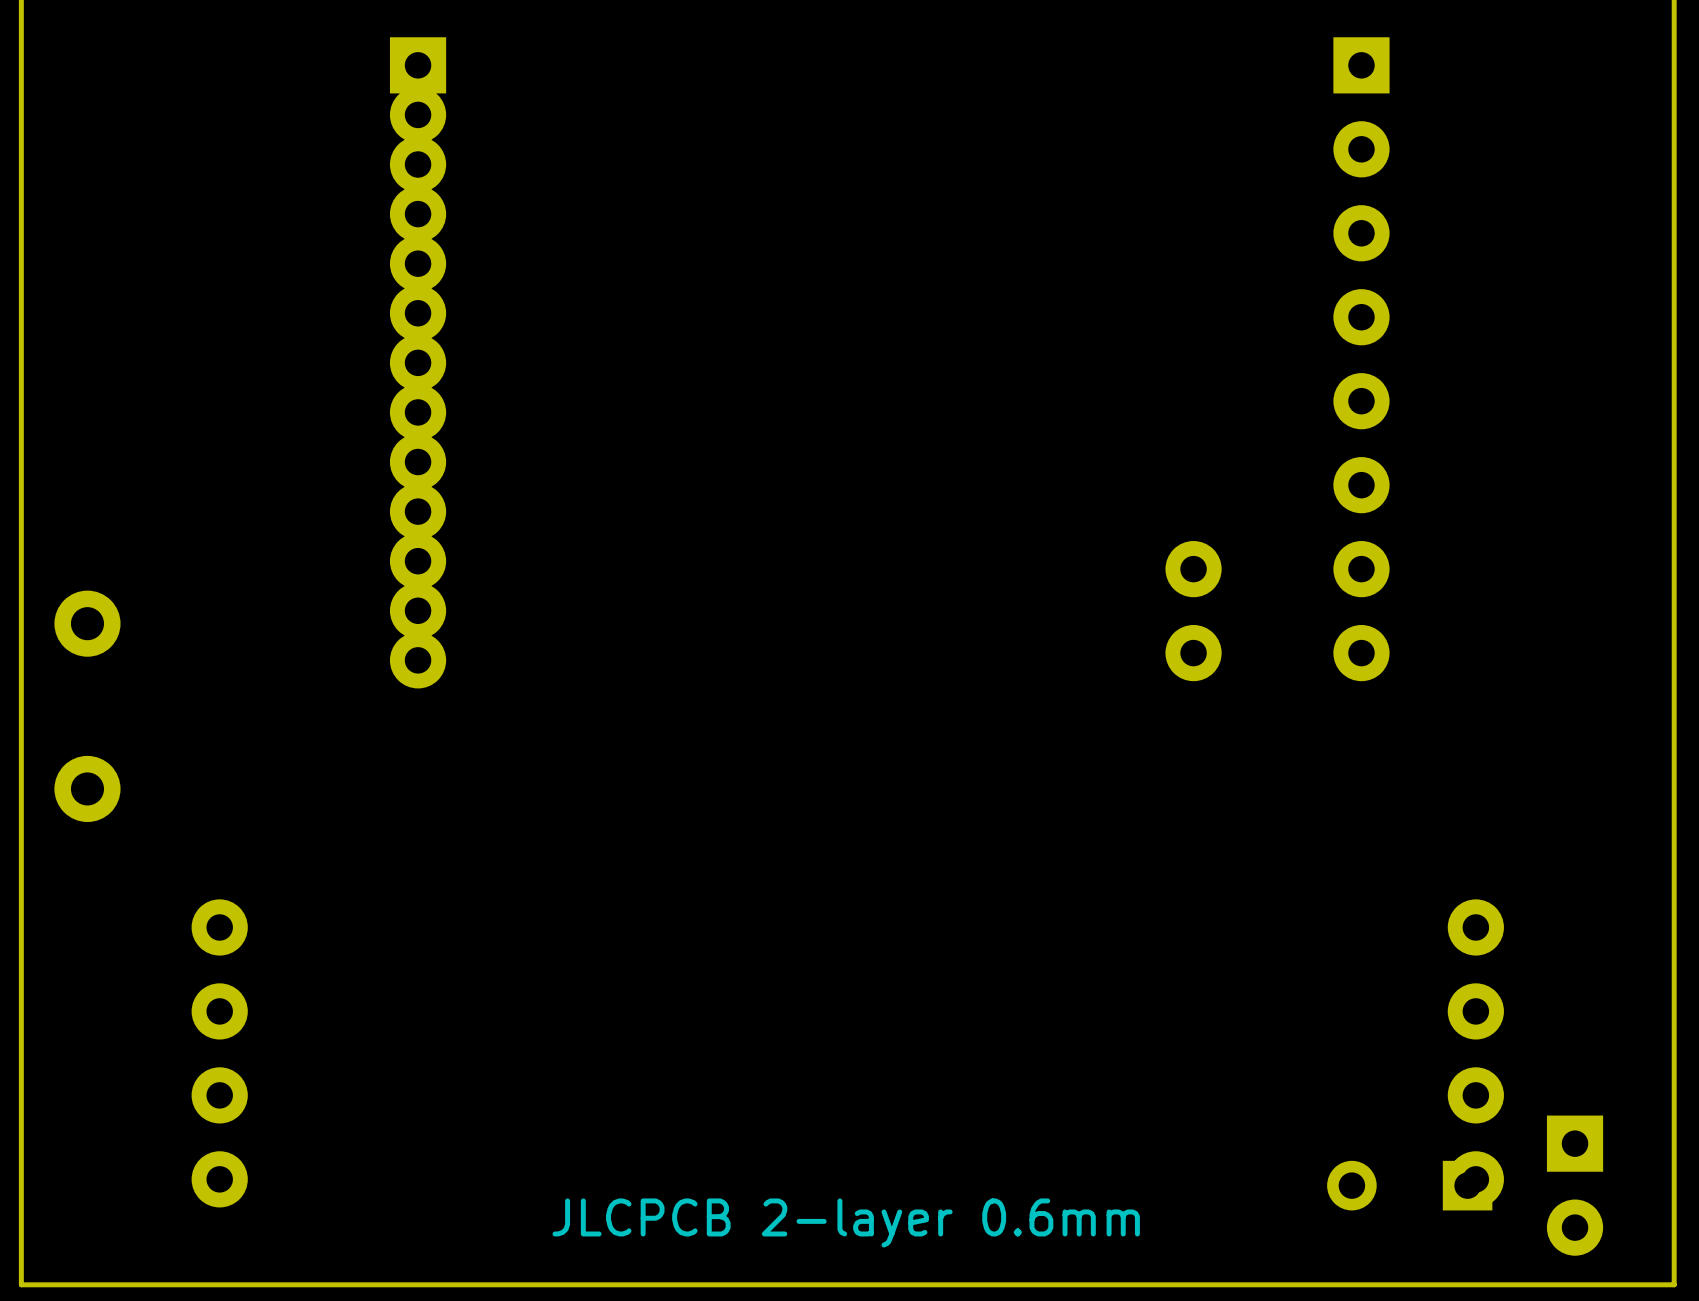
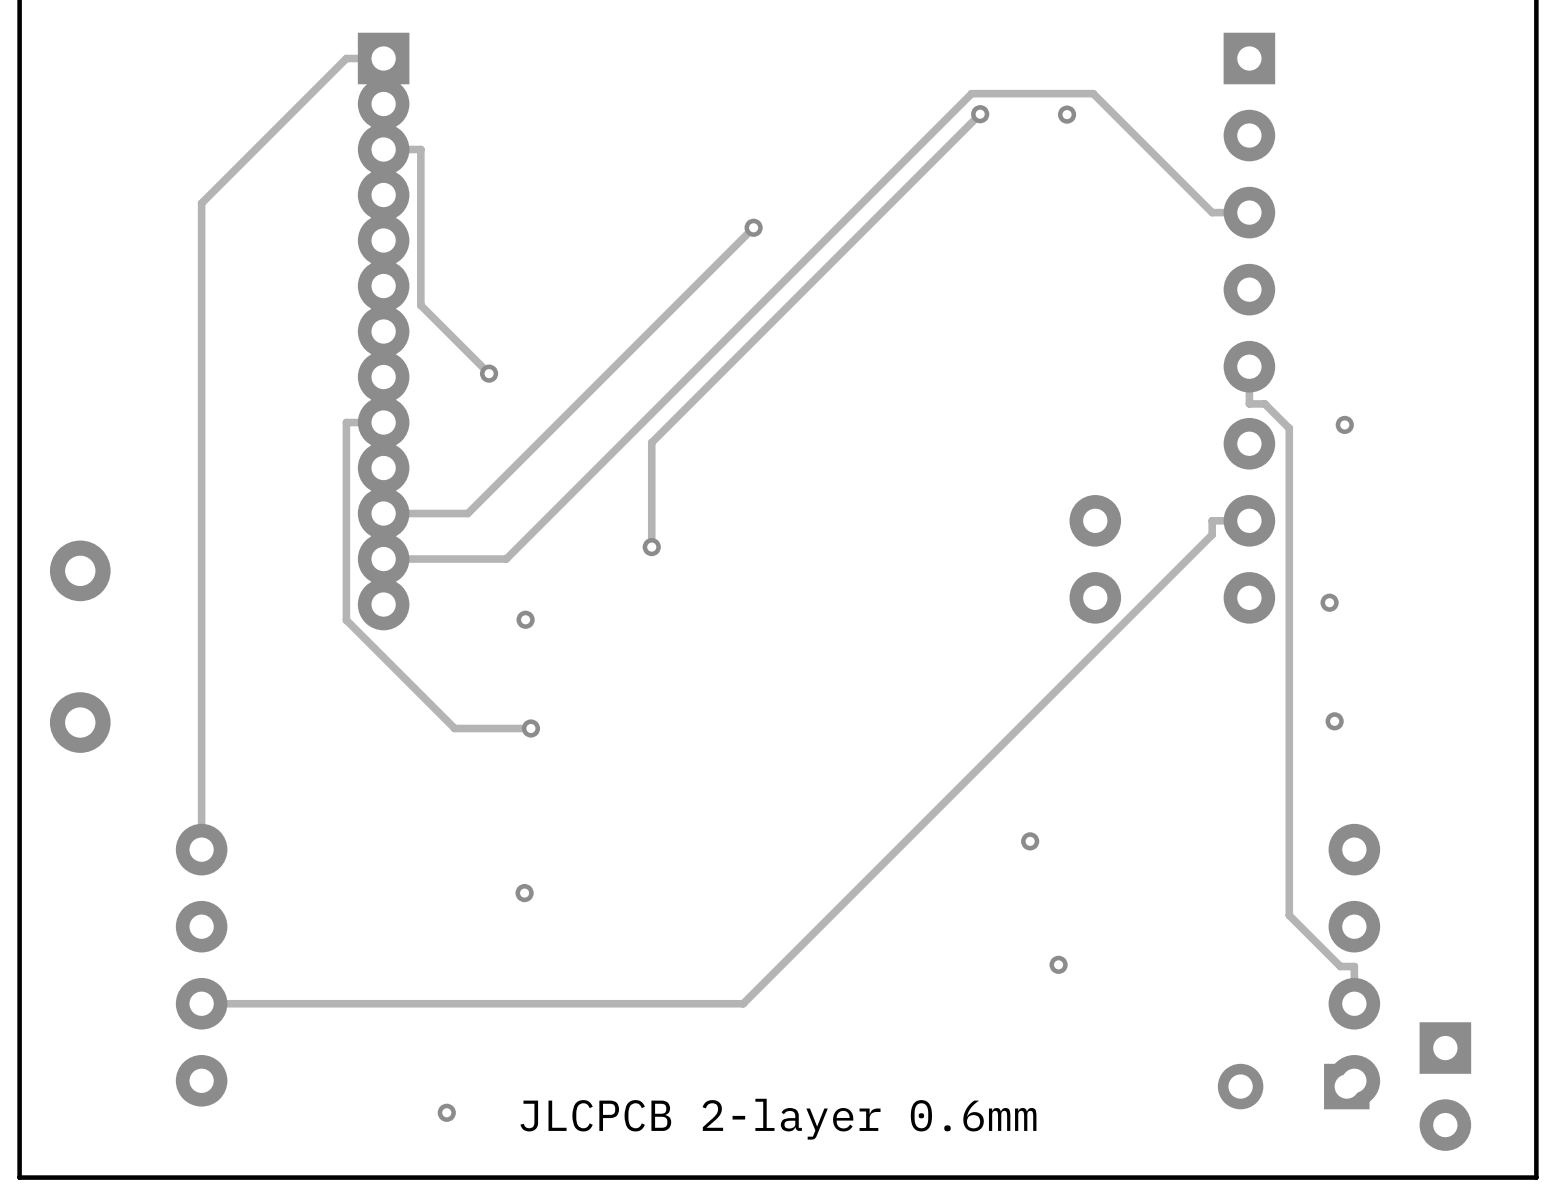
track: none -> (383, 58) (346, 58) (201, 203) (201, 849)
track: none -> (980, 114) (651, 442) (651, 547)
via: none -> (980, 114)
via: none -> (1067, 114)
track: none -> (383, 149) (420, 149) (420, 305) (489, 373)
track: none -> (1249, 212) (1212, 212) (1093, 93) (971, 93) (506, 559) (383, 559)
track: none -> (753, 227) (467, 513) (383, 513)
via: none -> (753, 227)
track: none -> (1249, 366) (1249, 403) (1264, 403) (1289, 428) (1289, 915) (1340, 966) (1354, 966) (1354, 1003)
via: none -> (489, 373)
track: none -> (383, 422) (346, 422) (346, 620) (454, 728) (530, 728)
via: none -> (1344, 424)
track: none -> (1249, 520) (1212, 520) (1212, 534) (743, 1003) (201, 1003)
via: none -> (651, 547)
via: none -> (1329, 602)
via: none -> (525, 619)
via: none -> (1334, 721)
via: none -> (530, 728)
via: none -> (1030, 841)
via: none -> (524, 893)
via: none -> (1058, 964)
via: none -> (446, 1112)

